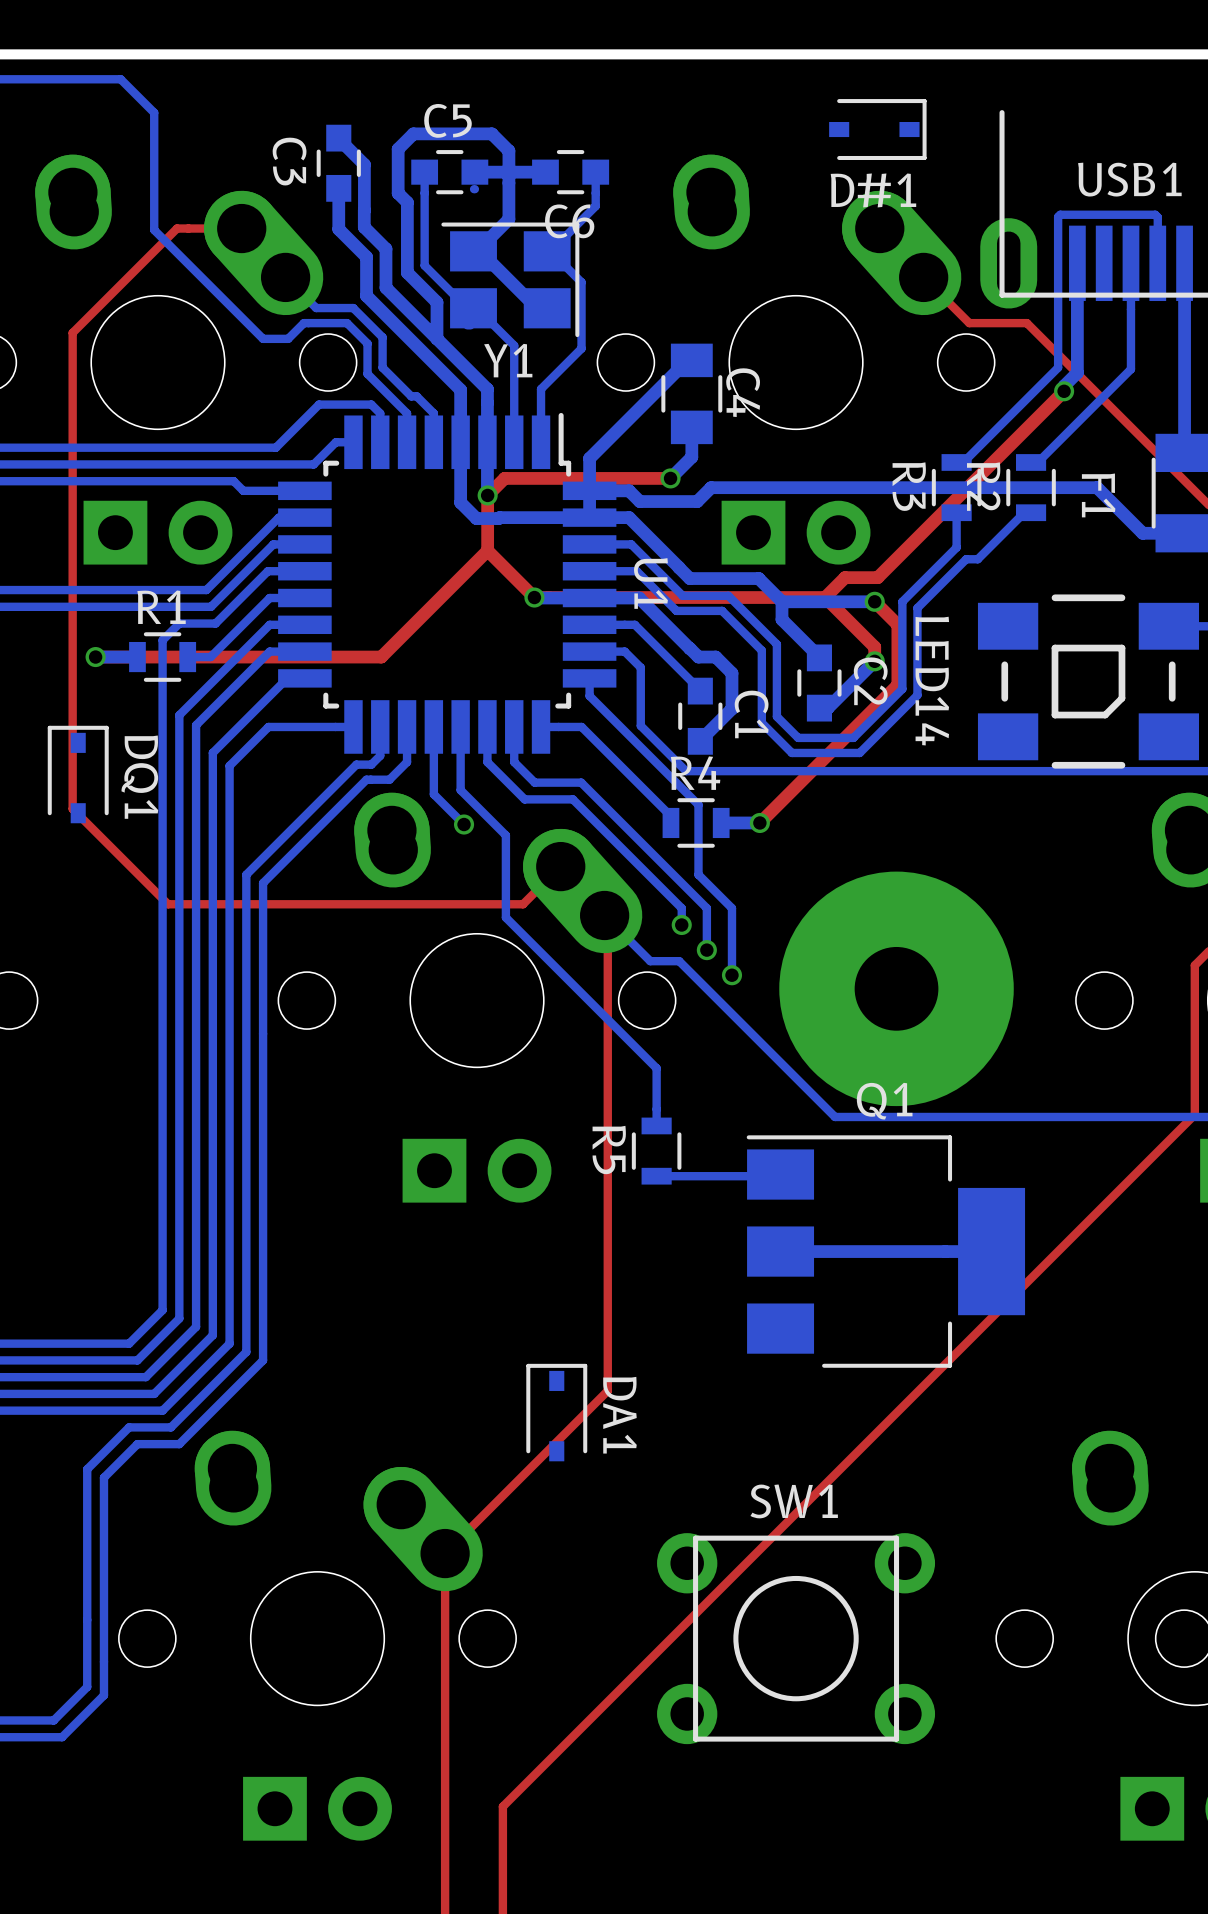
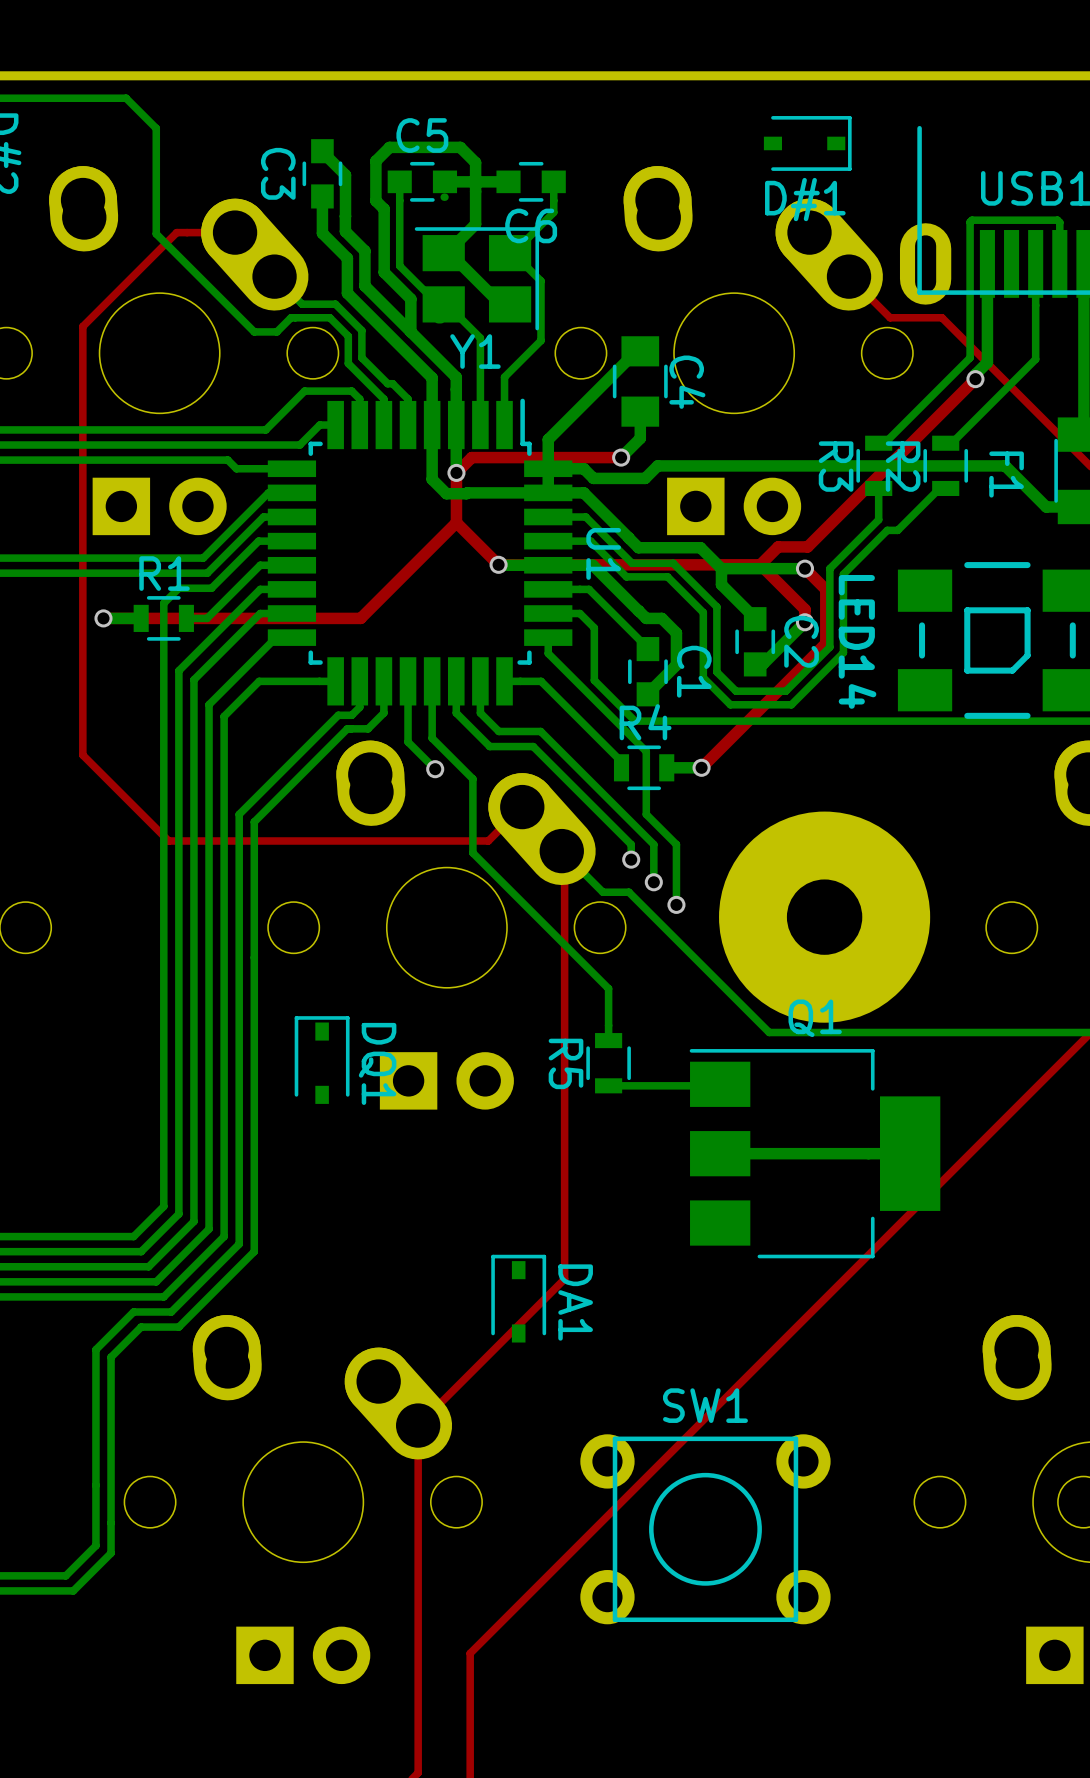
DQ1 position: (78, 774) -> (322, 1060)
SW1 position: (796, 1638) -> (705, 1529)

